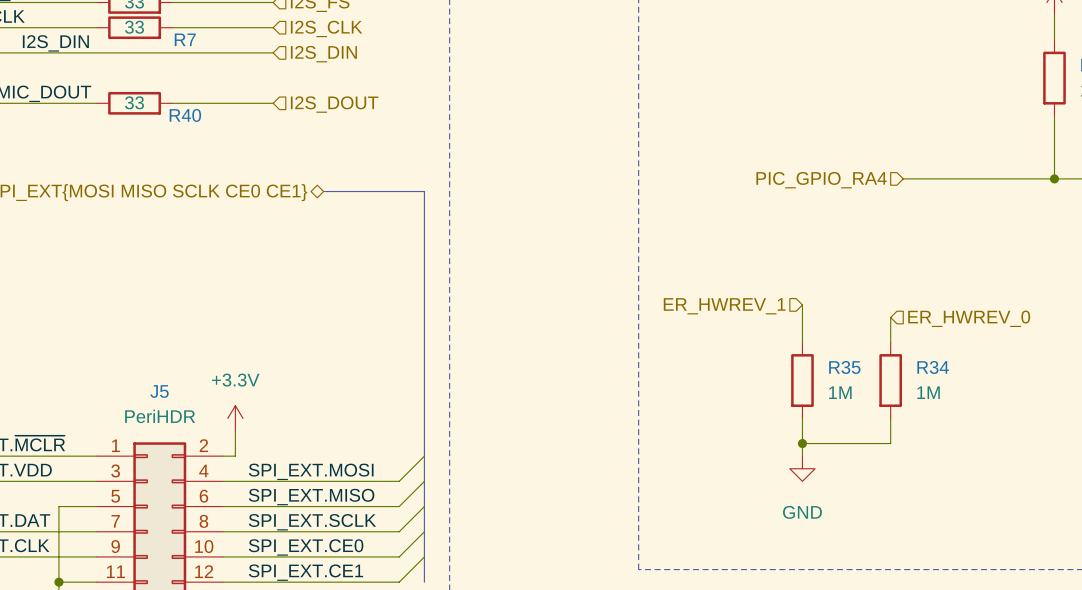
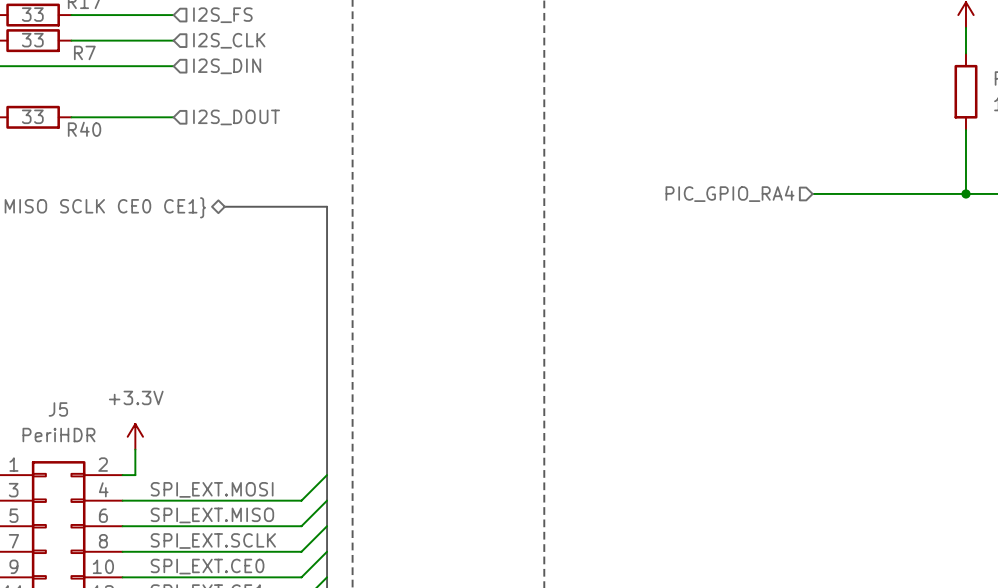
wire: (802, 304) (802, 342) -> none
hierarchical label: ER_HWREV_1 (724, 306) -> none
wire: (890, 317) (890, 342) -> none
hierarchical label: ER_HWREV_0 (969, 318) -> none
R35: 1M (802, 380) -> none
R34: 1M (890, 380) -> none
wire: (802, 418) (802, 456) -> none
wire: (890, 418) (890, 443) (802, 443) -> none
junction: (802, 443) -> none
power symbol: GND (802, 468) -> none

